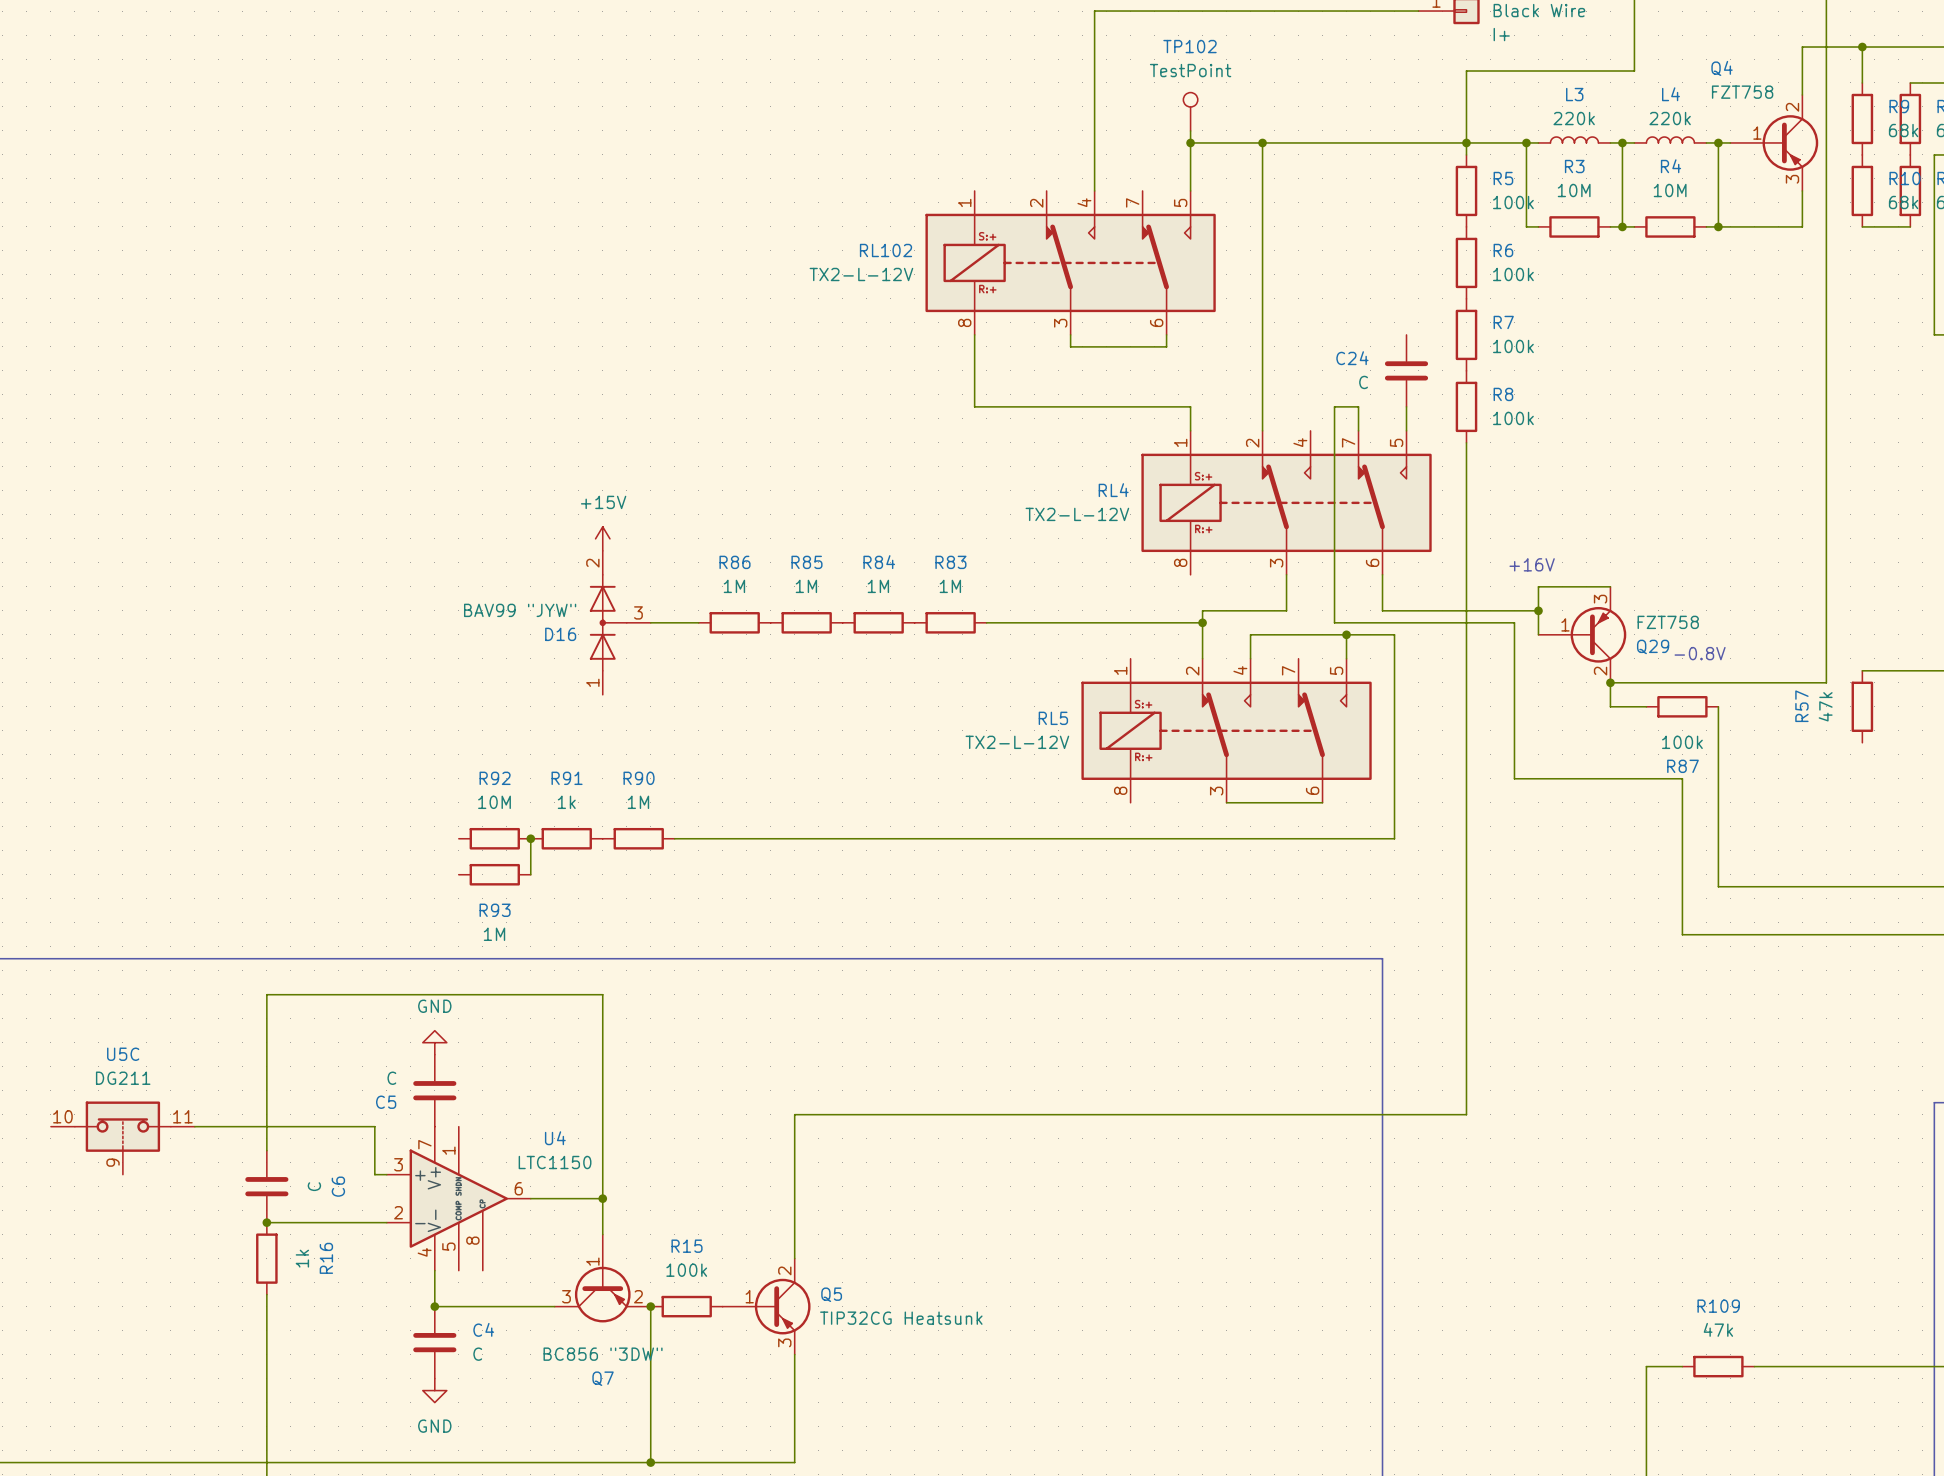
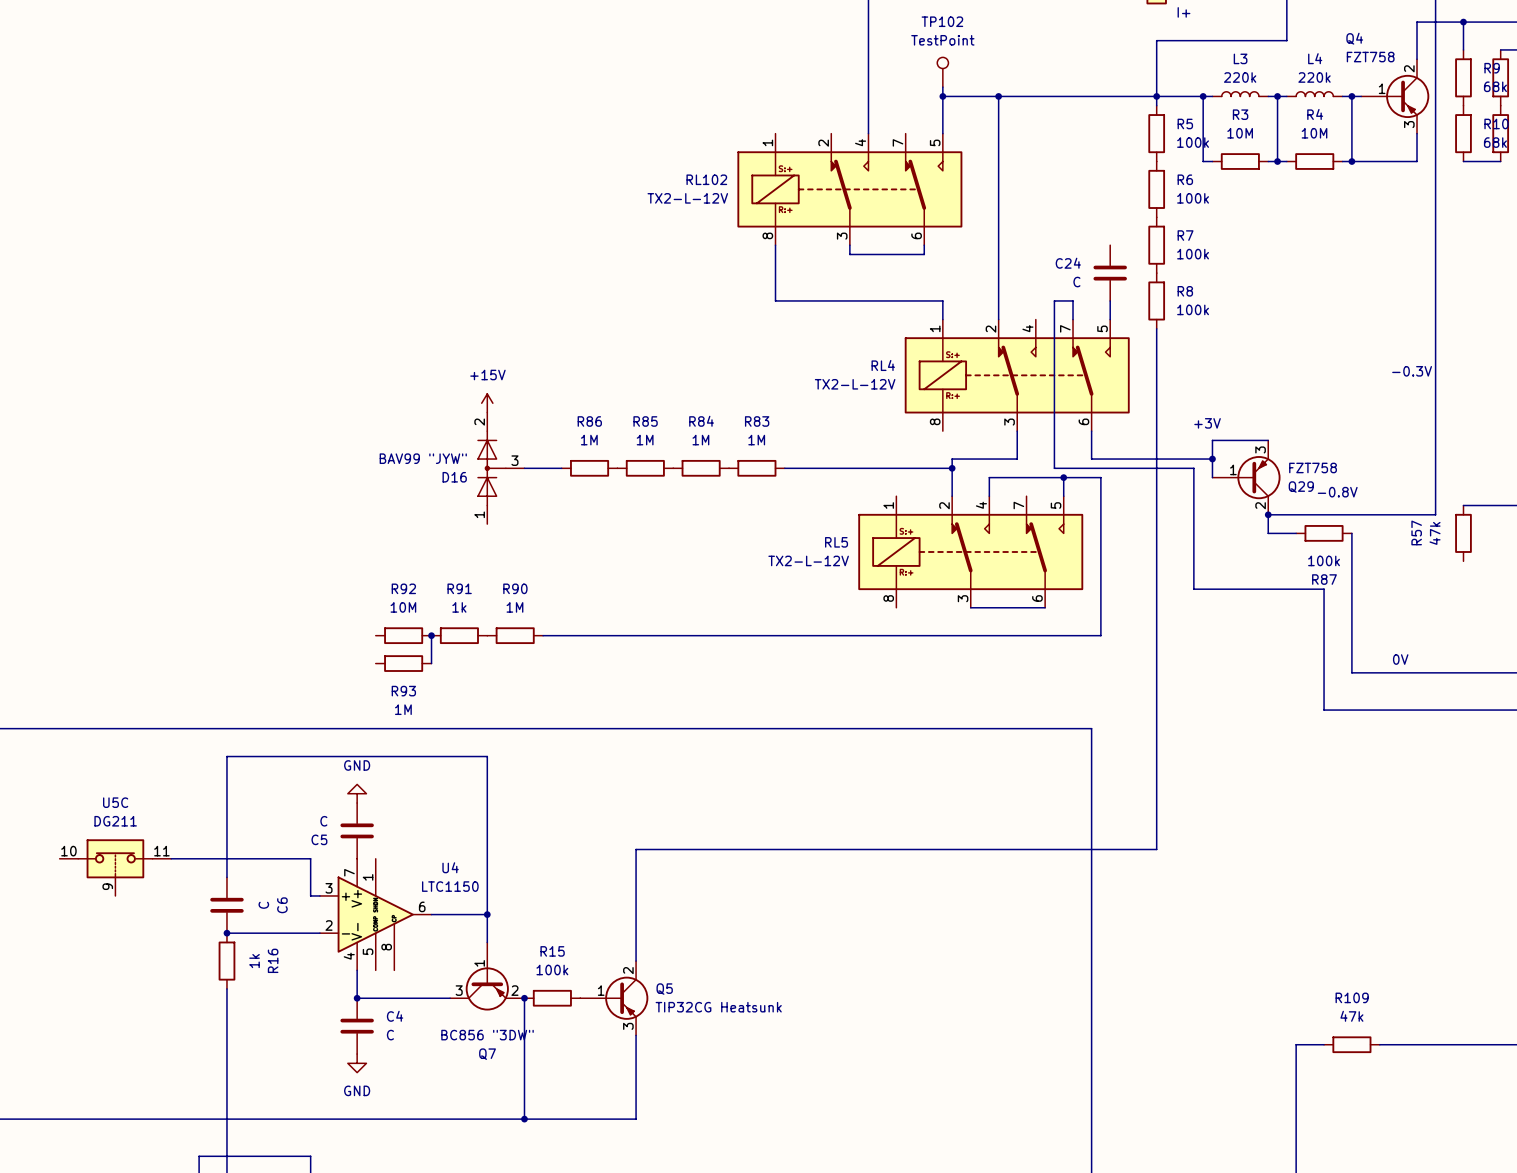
text: none -> -0.3V (1412, 371)
text: +16V (1532, 564) -> +3V (1207, 423)
text: none -> 0V (1400, 659)

